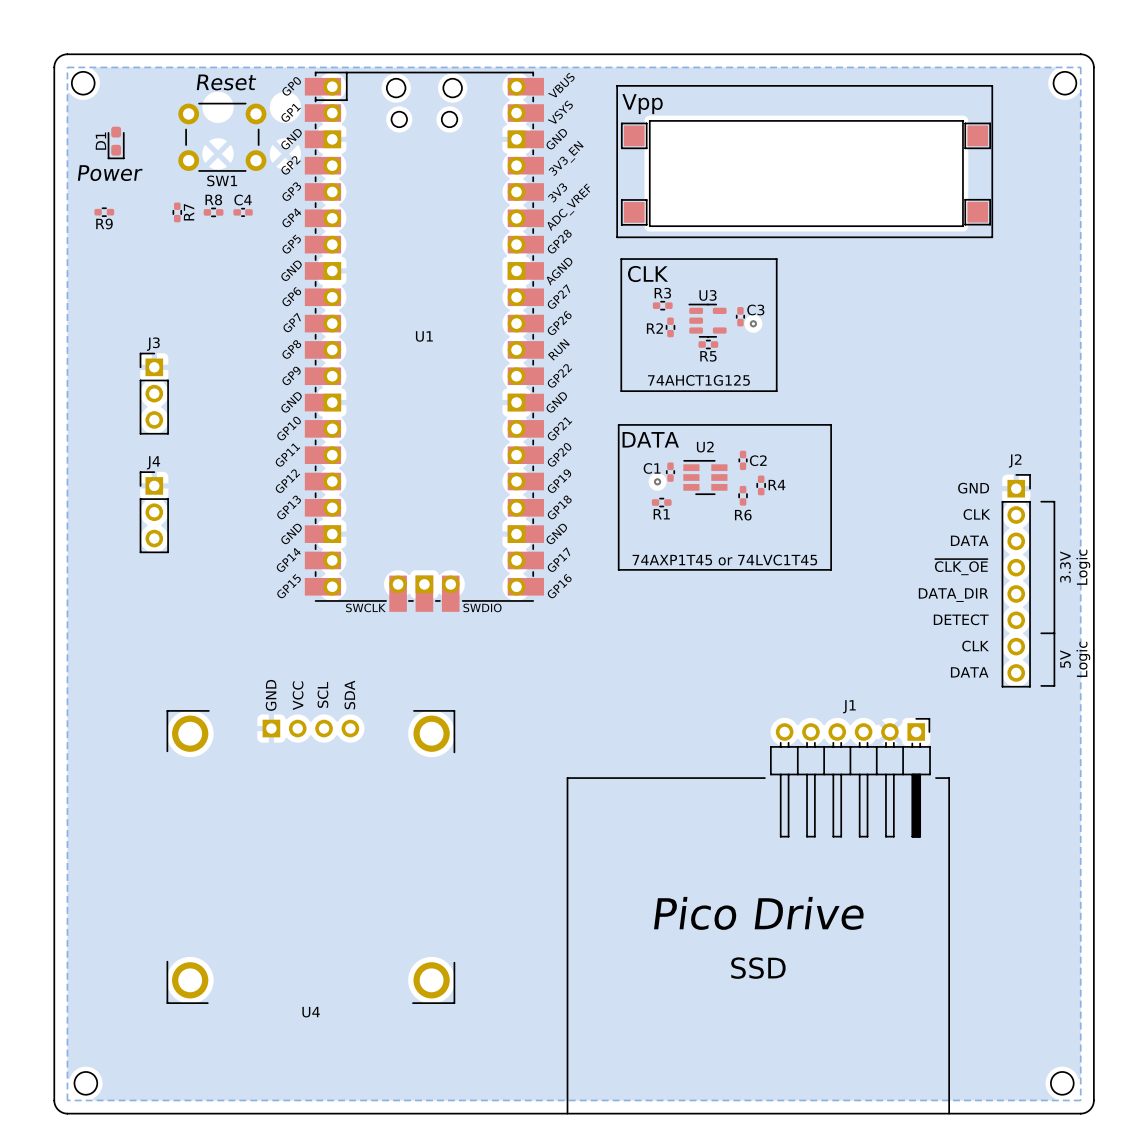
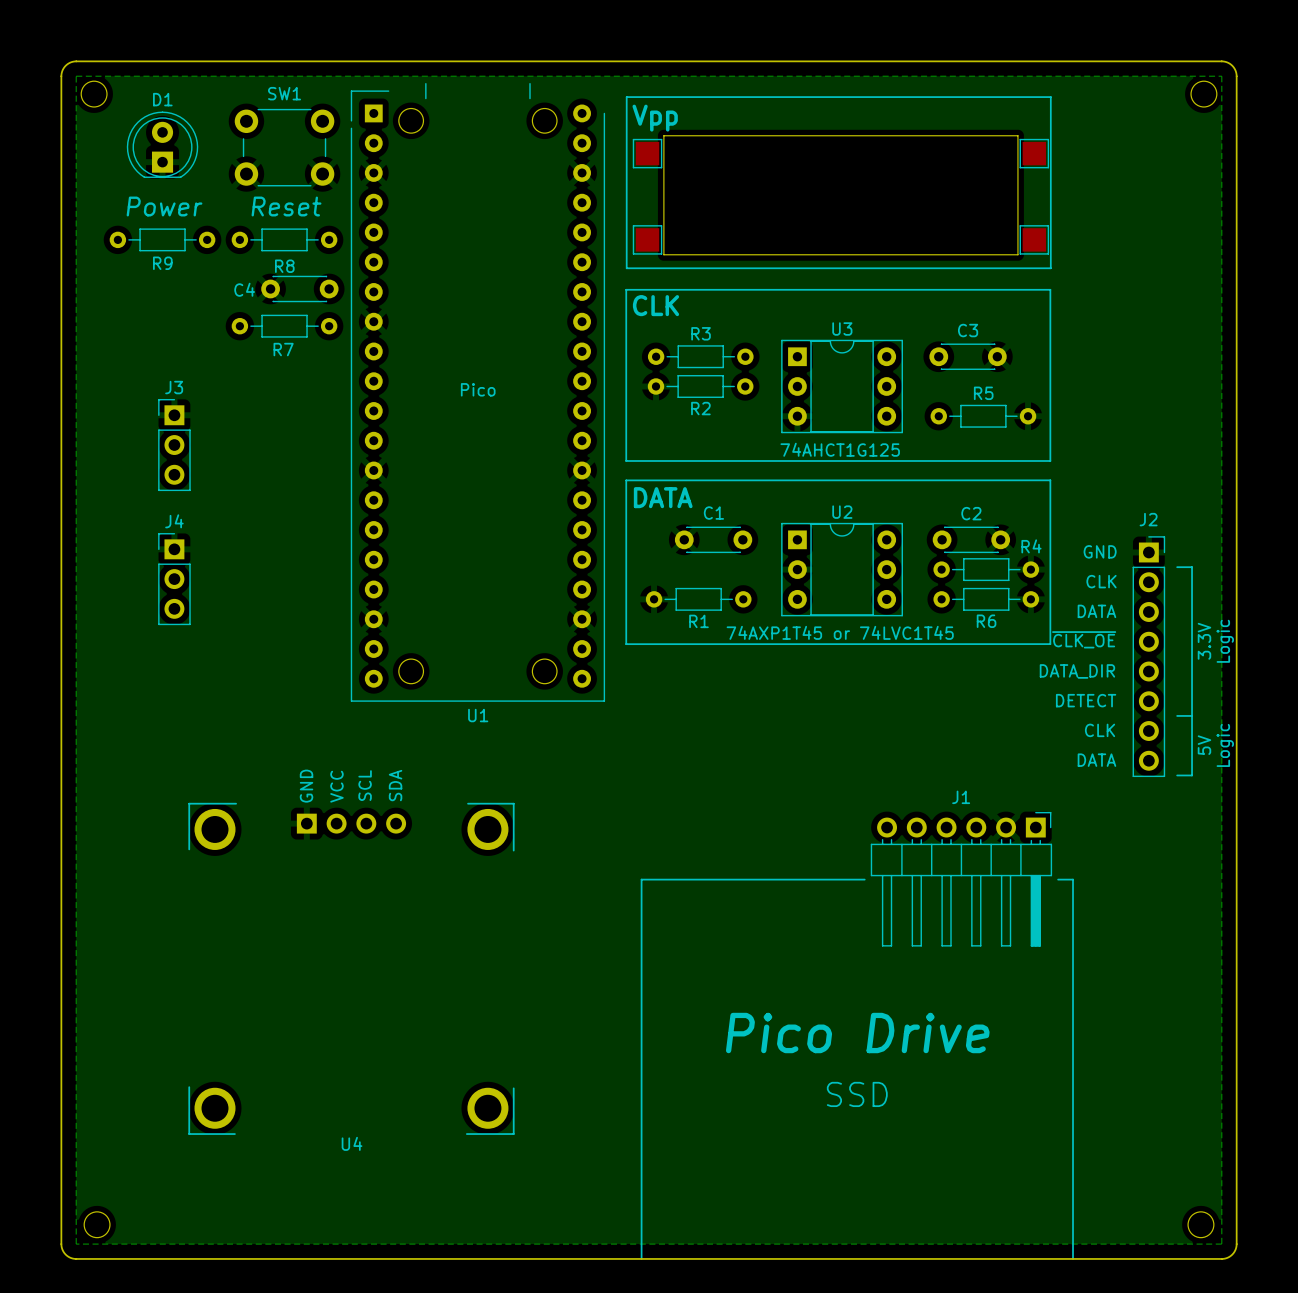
U1 footprint: [304, 71, 544, 612] -> [350, 82, 606, 702]
text position: Reset (226, 82) -> Reset (286, 206)
line: (617, 85) (617, 237) -> (697, 97) (626, 97) (626, 268) (697, 268)
line: (929, 85) (992, 85) (992, 237) (929, 237) -> (1050, 97) (1050, 268)
text position: Vpp (642, 104) -> Vpp (655, 118)
board edge: (649, 120) (649, 226) (962, 226) (962, 120) (649, 120) -> (663, 135) (663, 254) (1017, 254) (1017, 135) (663, 135)
D1 footprint: [107, 126, 125, 159] -> [126, 111, 199, 178]
part: none -> (647, 153)
part: (634, 135) -> none
part: none -> (1034, 153)
part: (977, 135) -> none
SW1 position: (222, 137) -> (284, 147)
D1 name position: D1 (100, 141) -> D1 (162, 99)
text position: Power (110, 173) -> Power (164, 206)
SW1 name position: SW1 (222, 180) -> SW1 (284, 93)
R8 name position: R8 (213, 199) -> R8 (284, 266)
C4 name position: C4 (243, 200) -> C4 (244, 289)
R7 footprint: [172, 202, 182, 223] -> [231, 314, 338, 338]
R9 footprint: [94, 207, 115, 217] -> [109, 228, 216, 252]
R8 footprint: [203, 207, 224, 217] -> [231, 228, 338, 252]
C4 footprint: [233, 208, 253, 217] -> [261, 275, 339, 303]
R7 name position: R7 (189, 212) -> R7 (283, 349)
part: none -> (647, 239)
part: (634, 212) -> none
part: none -> (1034, 239)
part: (977, 212) -> none
line: none -> (626, 289) (626, 460) (1050, 460) (1050, 289) (626, 289)
line: (621, 259) (776, 259) (776, 391) (621, 391) (621, 259) -> none
text position: CLK (648, 274) -> CLK (656, 305)
U3 name position: U3 (707, 295) -> U3 (842, 329)
R3 footprint: [652, 301, 673, 311] -> [647, 345, 754, 369]
U3 footprint: [688, 303, 727, 338] -> [781, 339, 903, 434]
C3 footprint: [736, 307, 745, 327] -> [929, 343, 1007, 370]
C3 name position: C3 (755, 310) -> C3 (968, 330)
R2 footprint: [665, 317, 676, 338] -> [647, 375, 754, 398]
via: (753, 323) -> none
R2 name position: R2 (654, 328) -> R2 (700, 408)
U1 name position: U1 (424, 336) -> U1 (478, 715)
R5 footprint: [698, 339, 719, 350] -> [930, 404, 1037, 428]
U1 value: none -> Pico (478, 389)
R5 name position: R5 (708, 356) -> R5 (983, 393)
text position: 74AHCT1G125 (698, 380) -> 74AHCT1G125 (840, 449)
text position: DATA (650, 439) -> DATA (663, 497)
C2 footprint: [738, 450, 748, 471] -> [932, 526, 1011, 554]
U2 footprint: [683, 460, 728, 495] -> [781, 522, 903, 617]
C2 name position: C2 (758, 460) -> C2 (971, 513)
C1 footprint: [666, 462, 675, 482] -> [674, 526, 753, 554]
C1 name position: C1 (652, 468) -> C1 (713, 513)
R4 footprint: [756, 475, 766, 496] -> [933, 558, 1040, 582]
via: (657, 481) -> none
R6 footprint: [738, 485, 748, 506] -> [933, 587, 1040, 611]
R4 name position: R4 (777, 485) -> R4 (1031, 546)
R1 footprint: [651, 497, 672, 508] -> [645, 587, 752, 611]
text position: 74AXP1T45 or 74LVC1T45 (724, 560) -> 74AXP1T45 or 74LVC1T45 (840, 632)
line: (831, 569) (831, 424) (618, 424) (618, 569) -> (939, 644) (1050, 644) (1050, 480) (626, 480) (626, 644) (699, 644)

